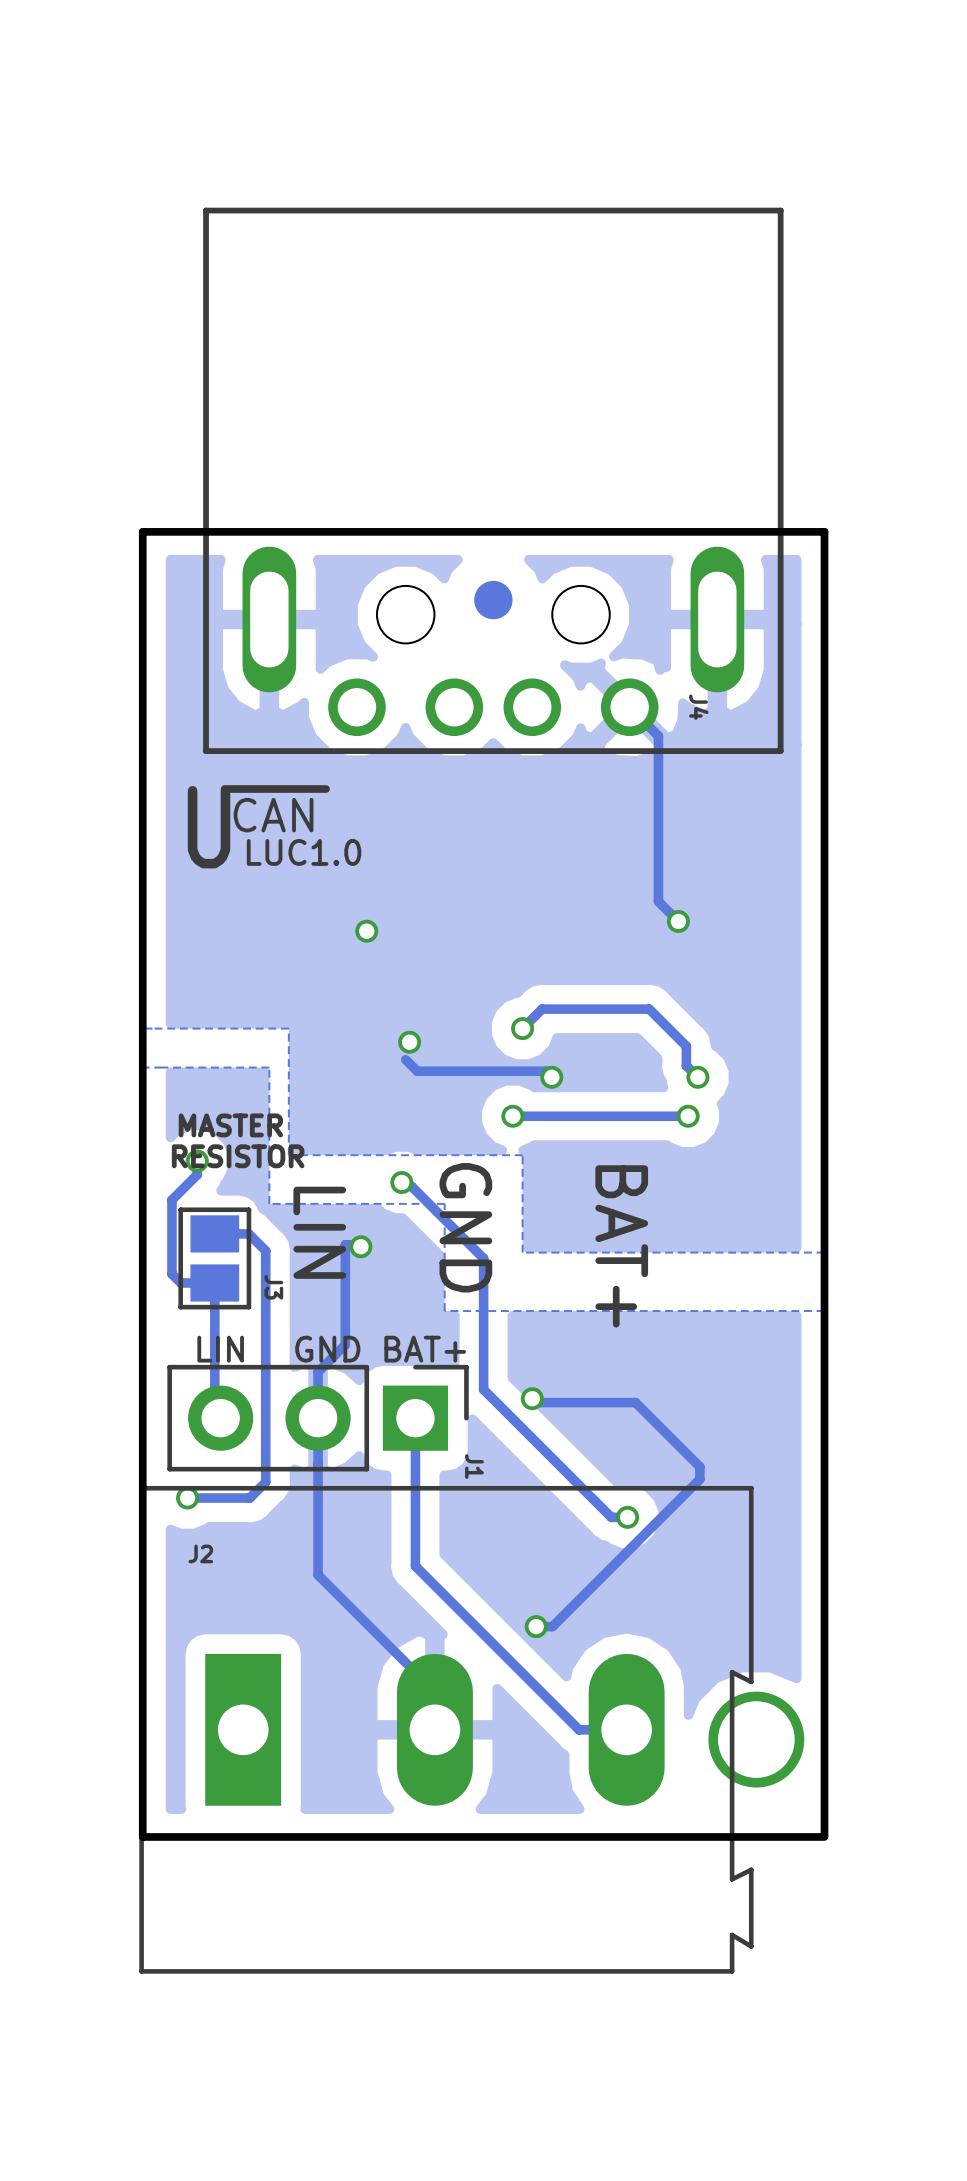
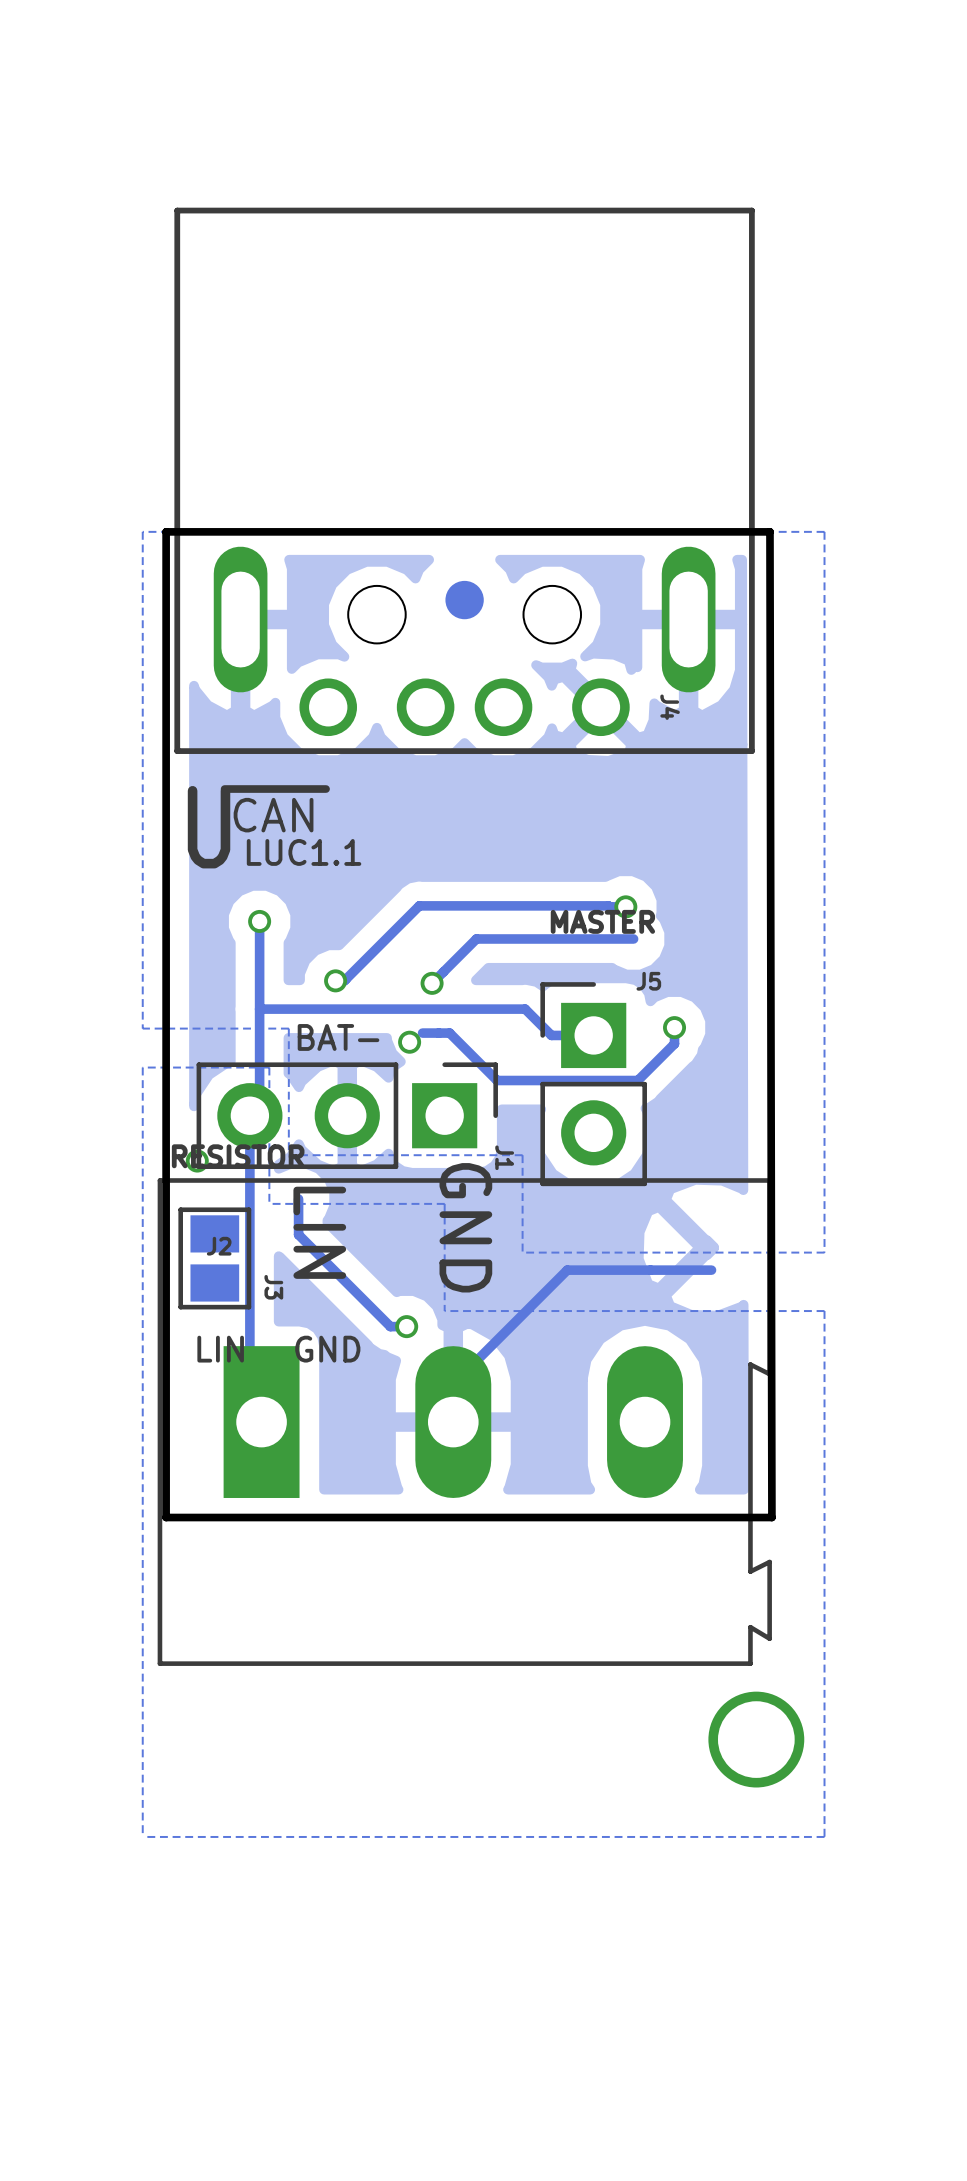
J4 position: (493, 480) -> (464, 480)
board edge: (166, 531) (142, 531) (142, 1836) (824, 1836) -> (166, 531) (166, 1517) (771, 1517) (769, 531)
board edge: (769, 531) (824, 531) (824, 1835) -> none
part position: (493, 600) -> (464, 600)
track: (629, 707) (658, 736) (658, 901) (678, 921) -> none
text: LUC1.0 (304, 852) -> LUC1.1 (304, 852)
track: none -> (625, 906) (419, 905) (344, 980) (335, 980)
via: none -> (625, 906)
track: none -> (259, 921) (259, 1105) (249, 1115) (249, 1410) (261, 1422)
via: none -> (259, 921)
via: (678, 921) -> none
via: (366, 931) -> none
track: none -> (633, 938) (476, 938) (432, 983)
via: none -> (335, 980)
via: none -> (432, 983)
track: none -> (259, 1009) (525, 1009) (551, 1035) (593, 1035)
track: none -> (674, 1027) (674, 1043) (637, 1080) (497, 1080) (449, 1033) (422, 1033)
via: none -> (674, 1027)
track: (522, 1028) (542, 1009) (649, 1009) (686, 1046) (686, 1065) (697, 1077) -> none
via: (522, 1028) -> none
text: none -> BAT- (338, 1037)
track: (405, 1059) (417, 1071) (545, 1071) (551, 1077) -> none
via: (551, 1077) -> none
via: (697, 1077) -> none
J5: none -> (593, 1084)
via: (512, 1116) -> none
track: (688, 1116) (512, 1116) -> none
via: (688, 1116) -> none
text position: MASTER (230, 1125) -> MASTER (602, 921)
track: (197, 1161) (197, 1174) (171, 1200) (171, 1274) (180, 1282) (214, 1282) (214, 1412) (220, 1418) -> none
track: (401, 1182) (405, 1186) (411, 1186) (483, 1258) (483, 1389) (611, 1517) (627, 1517) -> none
via: (401, 1182) -> none
track: none -> (298, 1199) (298, 1234) (390, 1326) (406, 1326)
track: (214, 1233) (248, 1233) (265, 1250) (265, 1482) (249, 1498) (187, 1498) -> none
track: (360, 1246) (358, 1244) (345, 1244) (345, 1344) (318, 1372) (318, 1574) (434, 1691) (434, 1729) -> none
via: (360, 1246) -> none
text: BAT+ (621, 1246) -> none
track: none -> (711, 1270) (567, 1270) (453, 1384) (453, 1422)
via: none -> (406, 1326)
text: BAT+ (425, 1349) -> none
track: (532, 1398) (536, 1402) (635, 1402) (699, 1466) (699, 1479) (552, 1626) (536, 1626) -> none
via: (532, 1398) -> none
J1 position: (318, 1418) -> (347, 1115)
track: (415, 1418) (415, 1566) (579, 1729) (626, 1729) -> none
J1 name position: J1 (474, 1466) -> J1 (504, 1157)
via: (187, 1498) -> none
via: (627, 1517) -> none
via: (536, 1626) -> none
J2 position: (446, 1729) -> (464, 1422)

